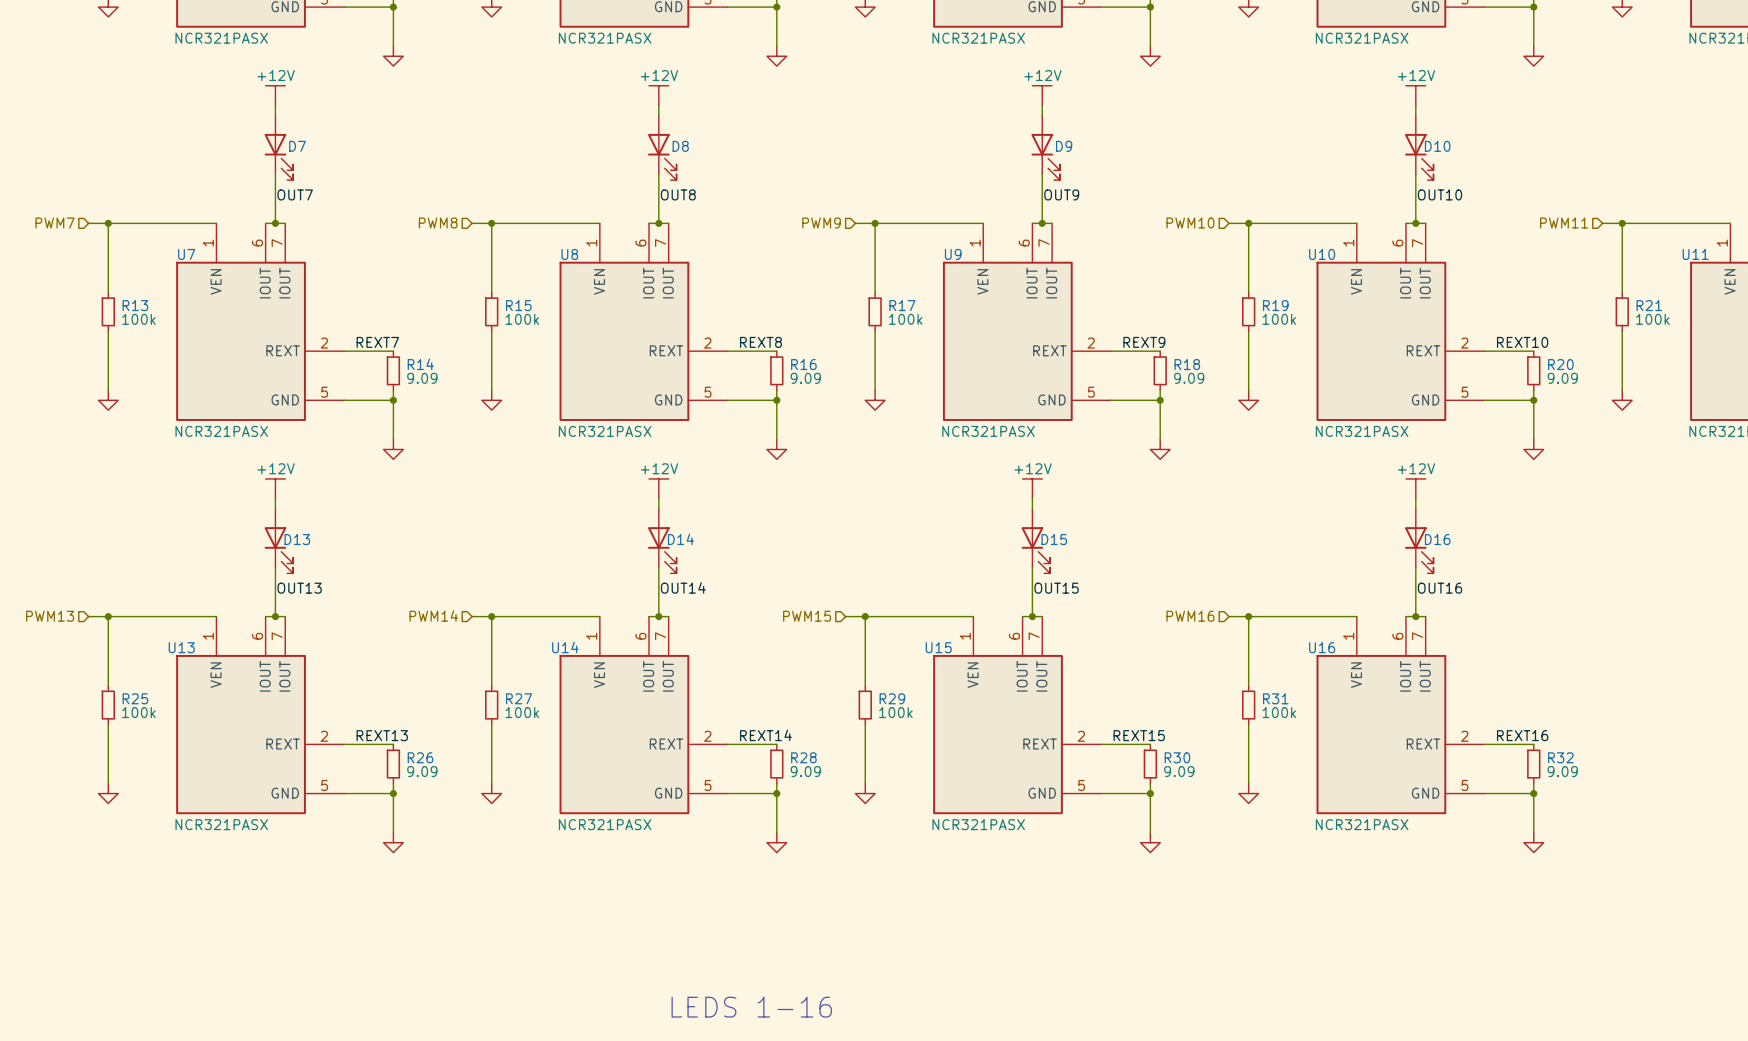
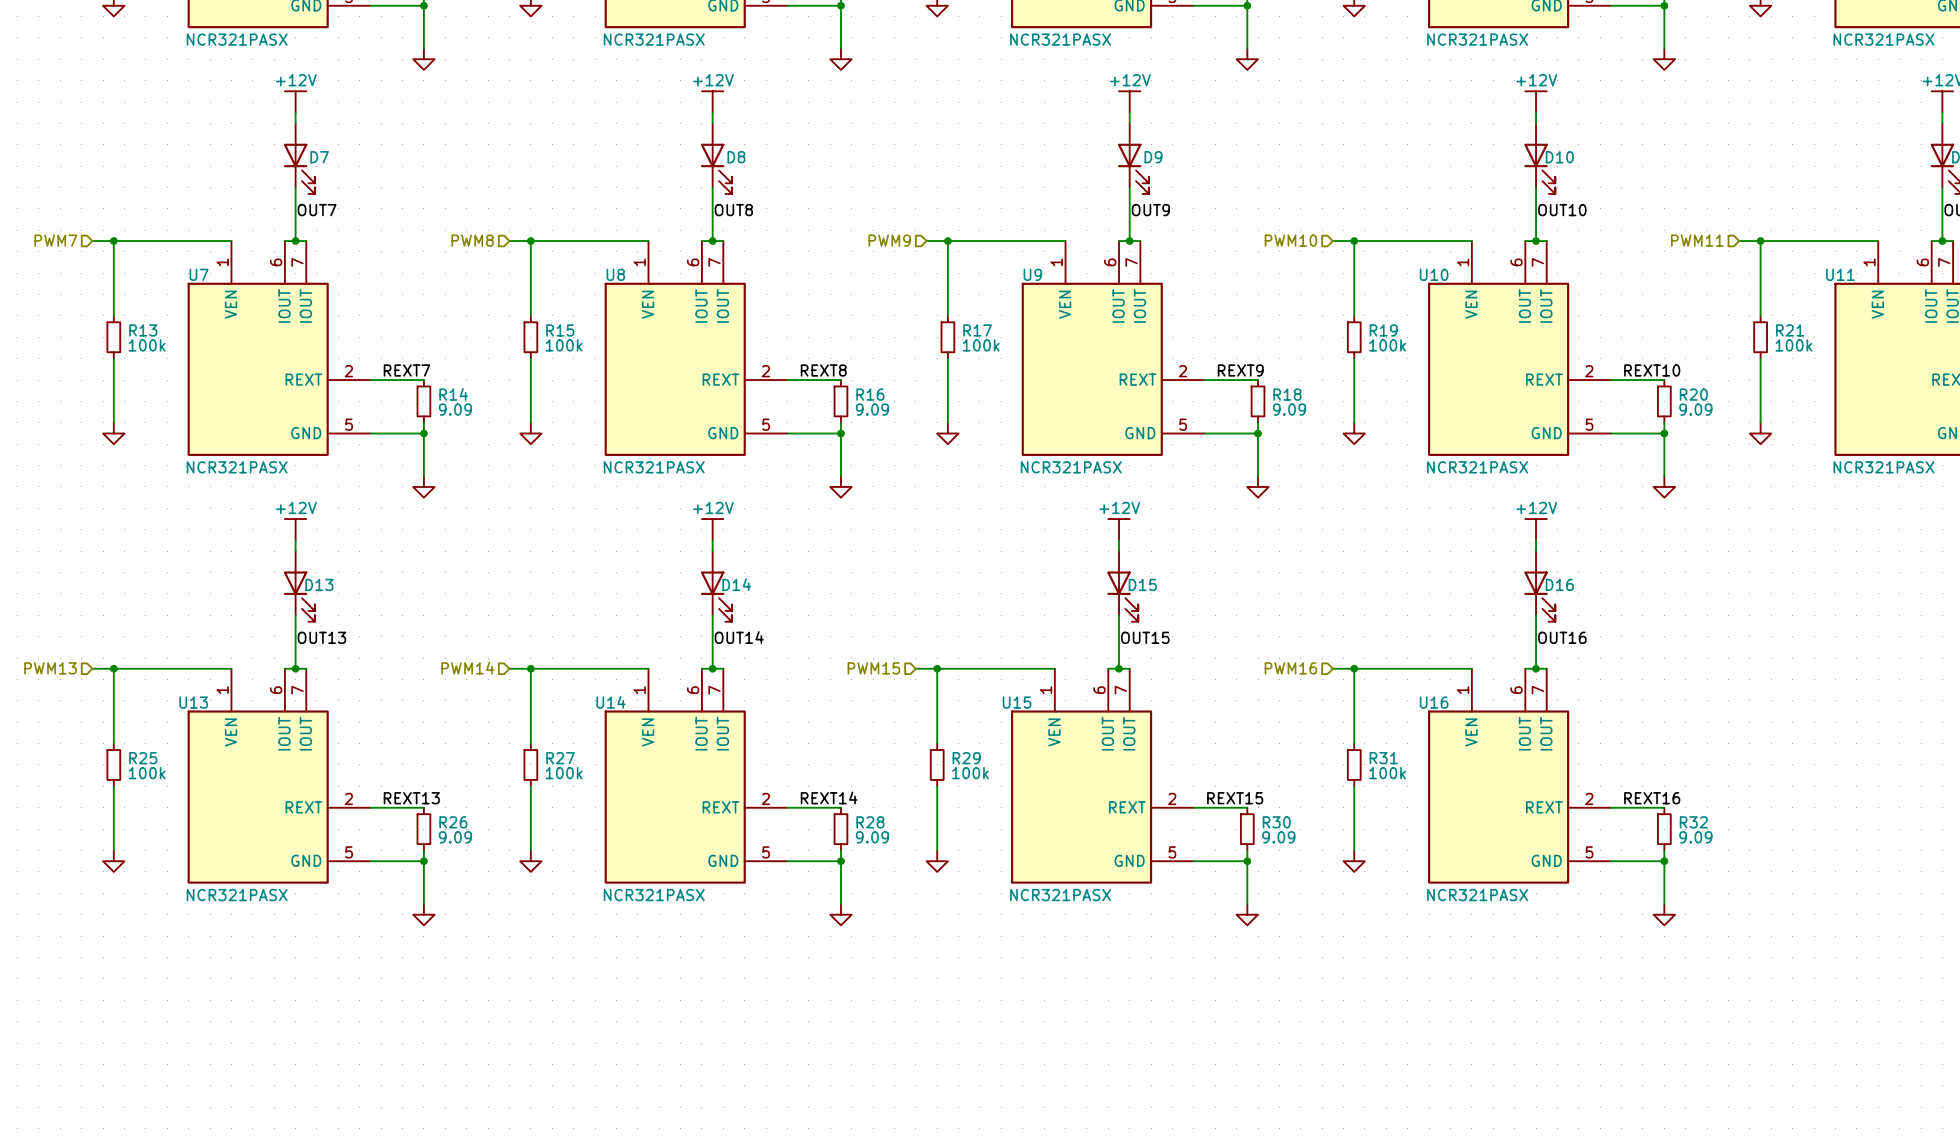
text: LEDS 1-16 (751, 1007) -> none

